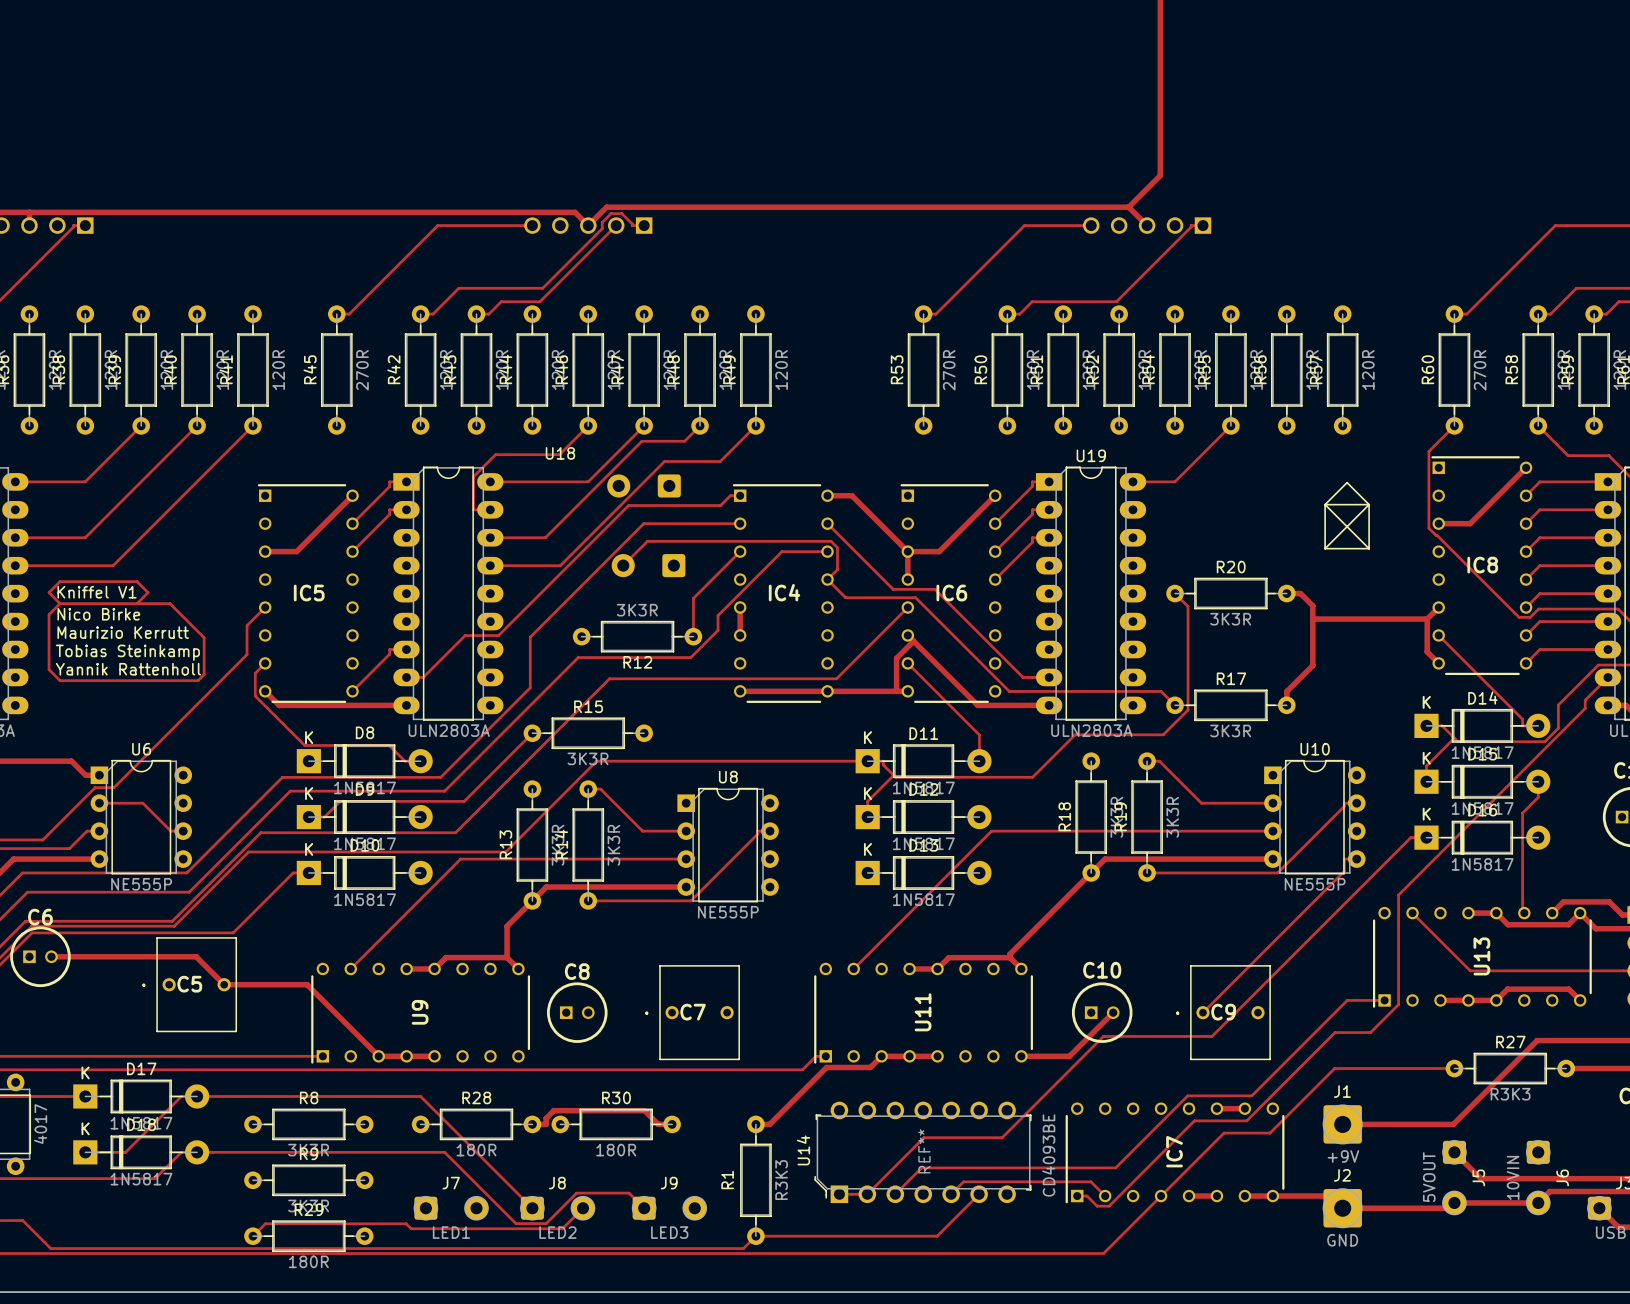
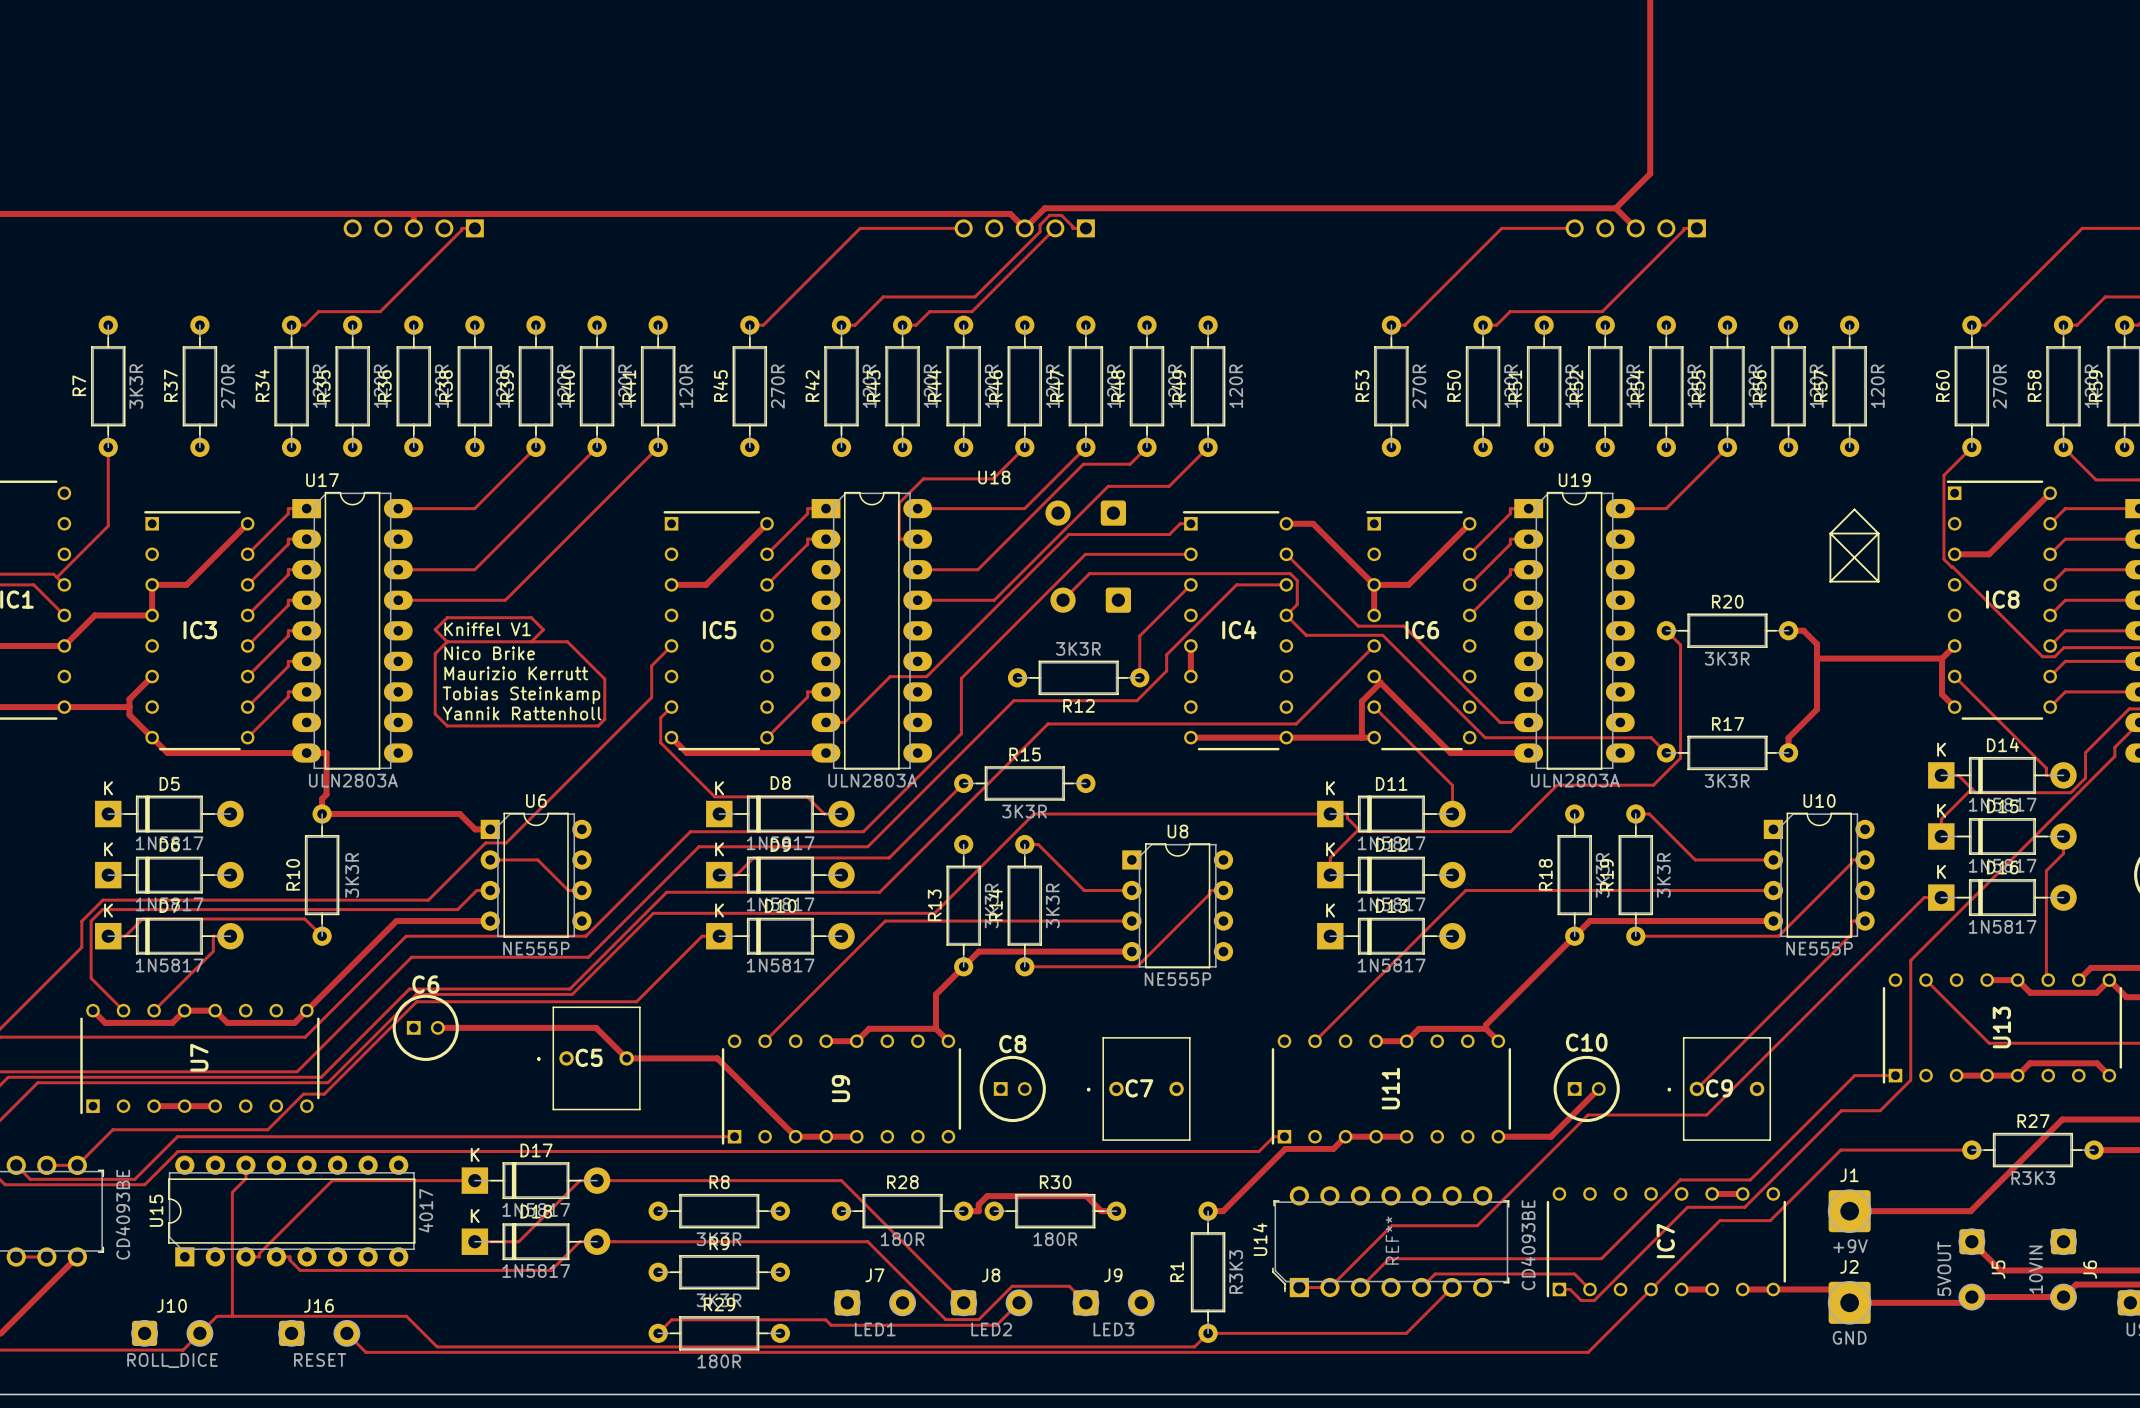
text: Nico Birke (98, 614) -> Nico Brike (489, 653)

